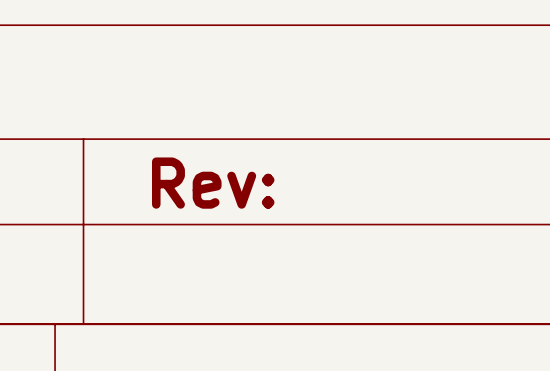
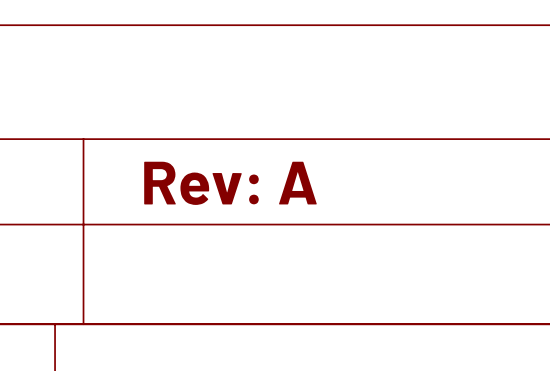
title block: Rev: (213, 183) -> Rev: A (230, 183)

